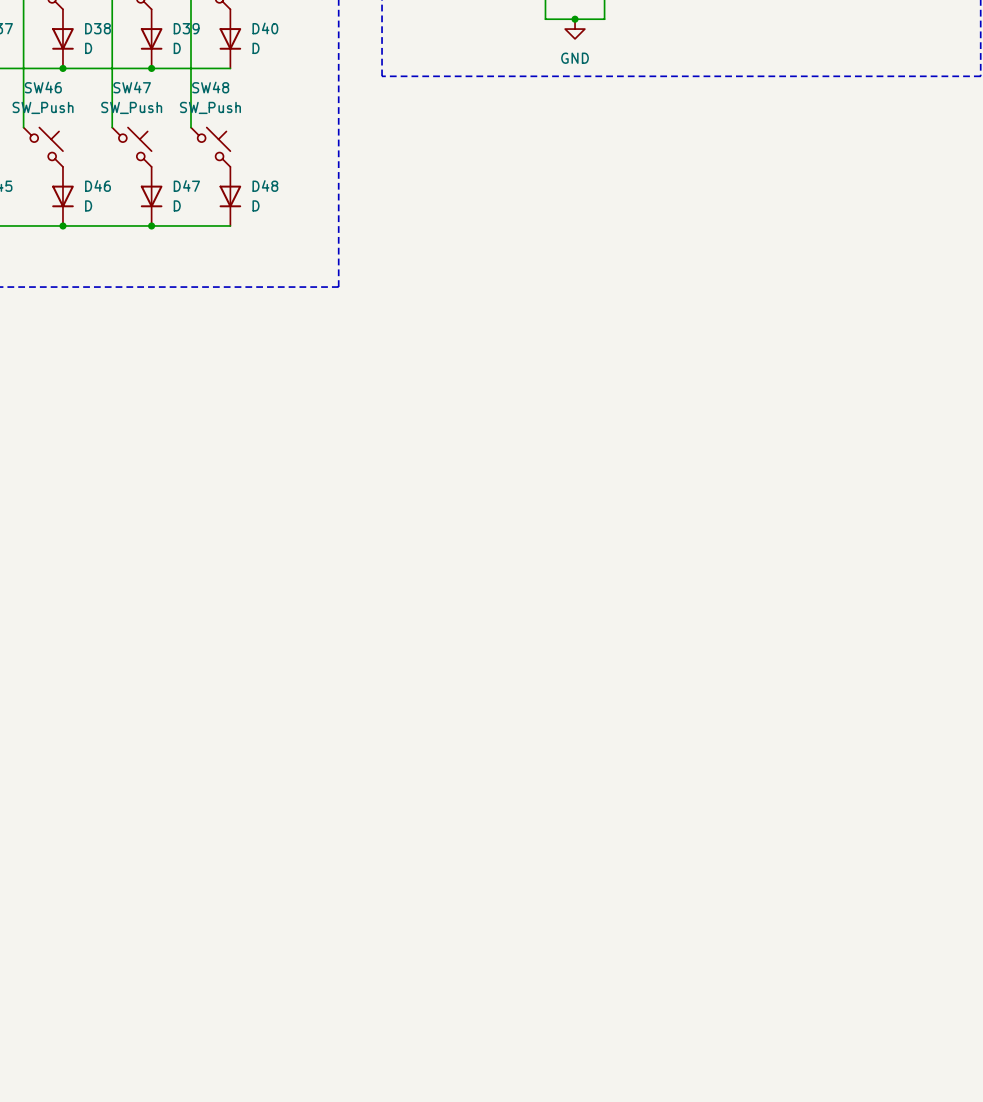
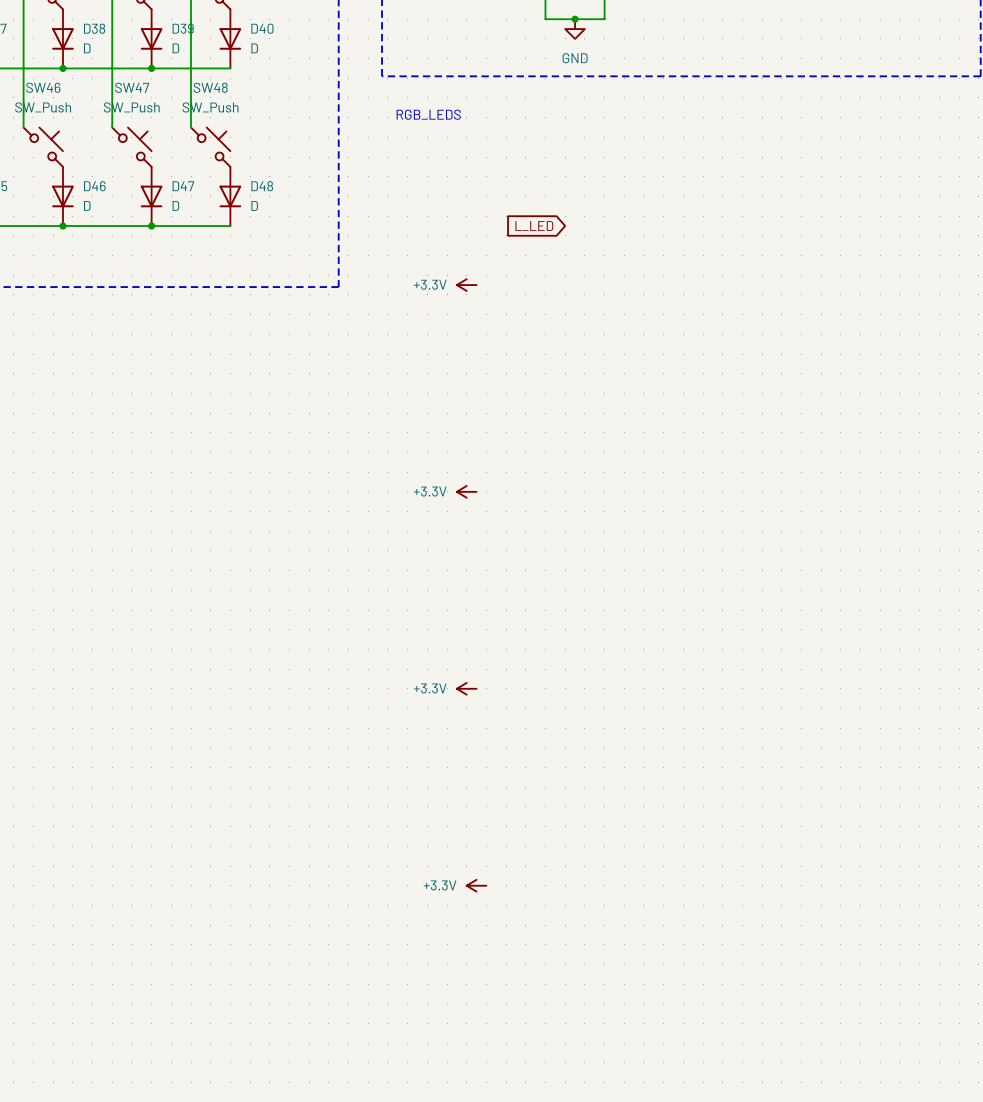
text: none -> RGB_LEDS (428, 114)
global label: none -> L_LED (534, 225)
power symbol: none -> +3.3V (466, 285)
power symbol: none -> +3.3V (466, 491)
power symbol: none -> +3.3V (466, 688)
power symbol: none -> +3.3V (476, 885)

